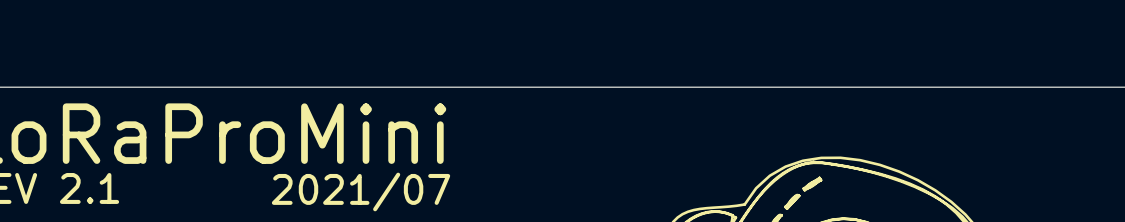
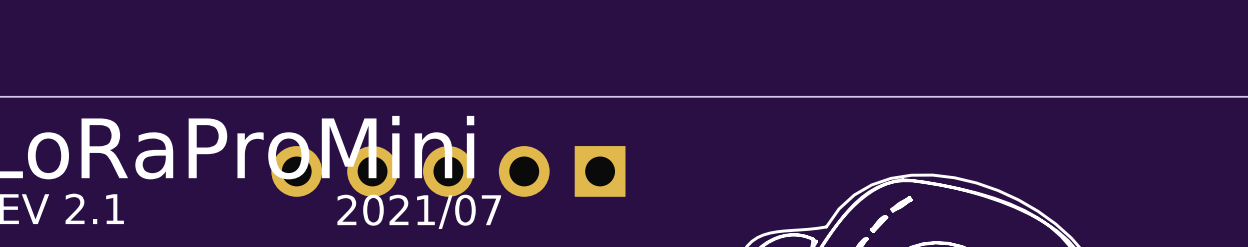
part: none -> (448, 171)

